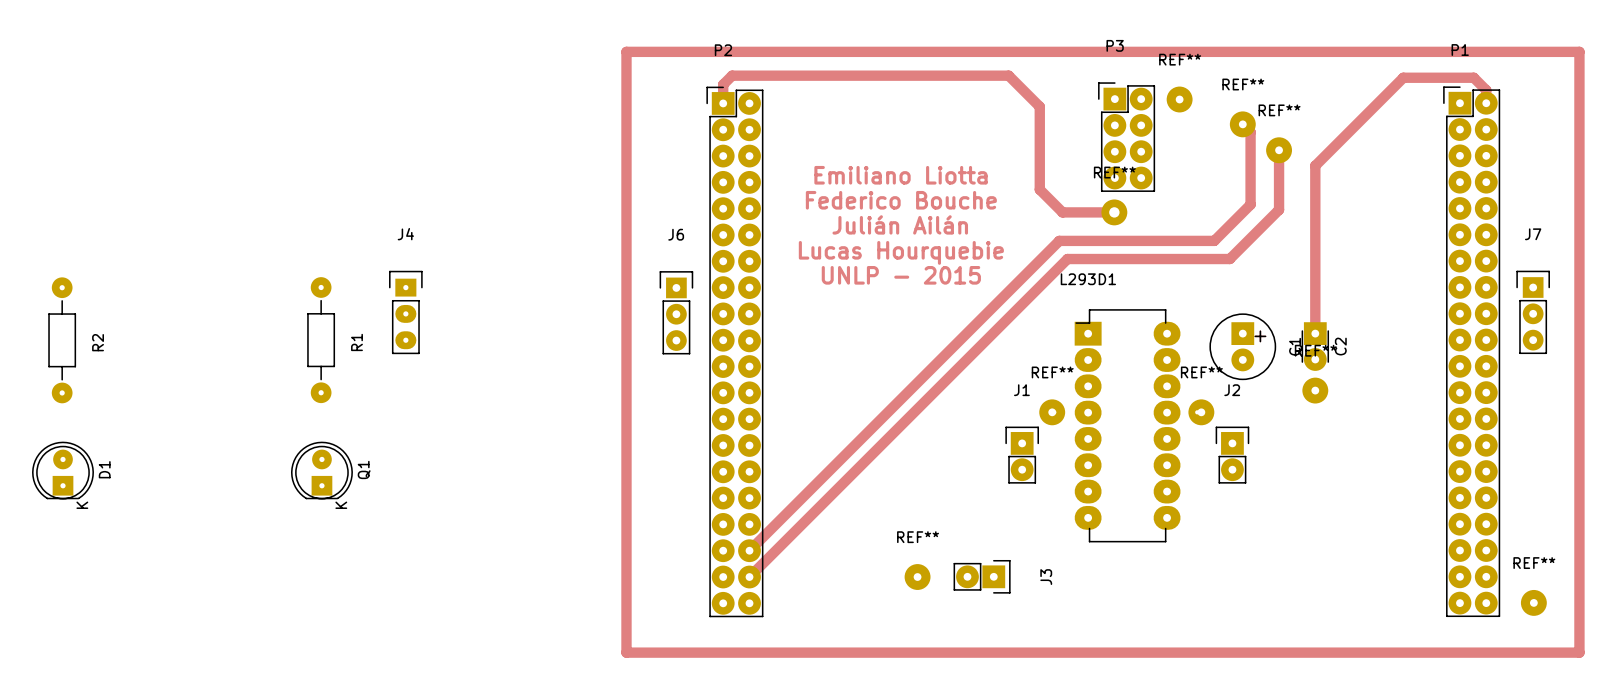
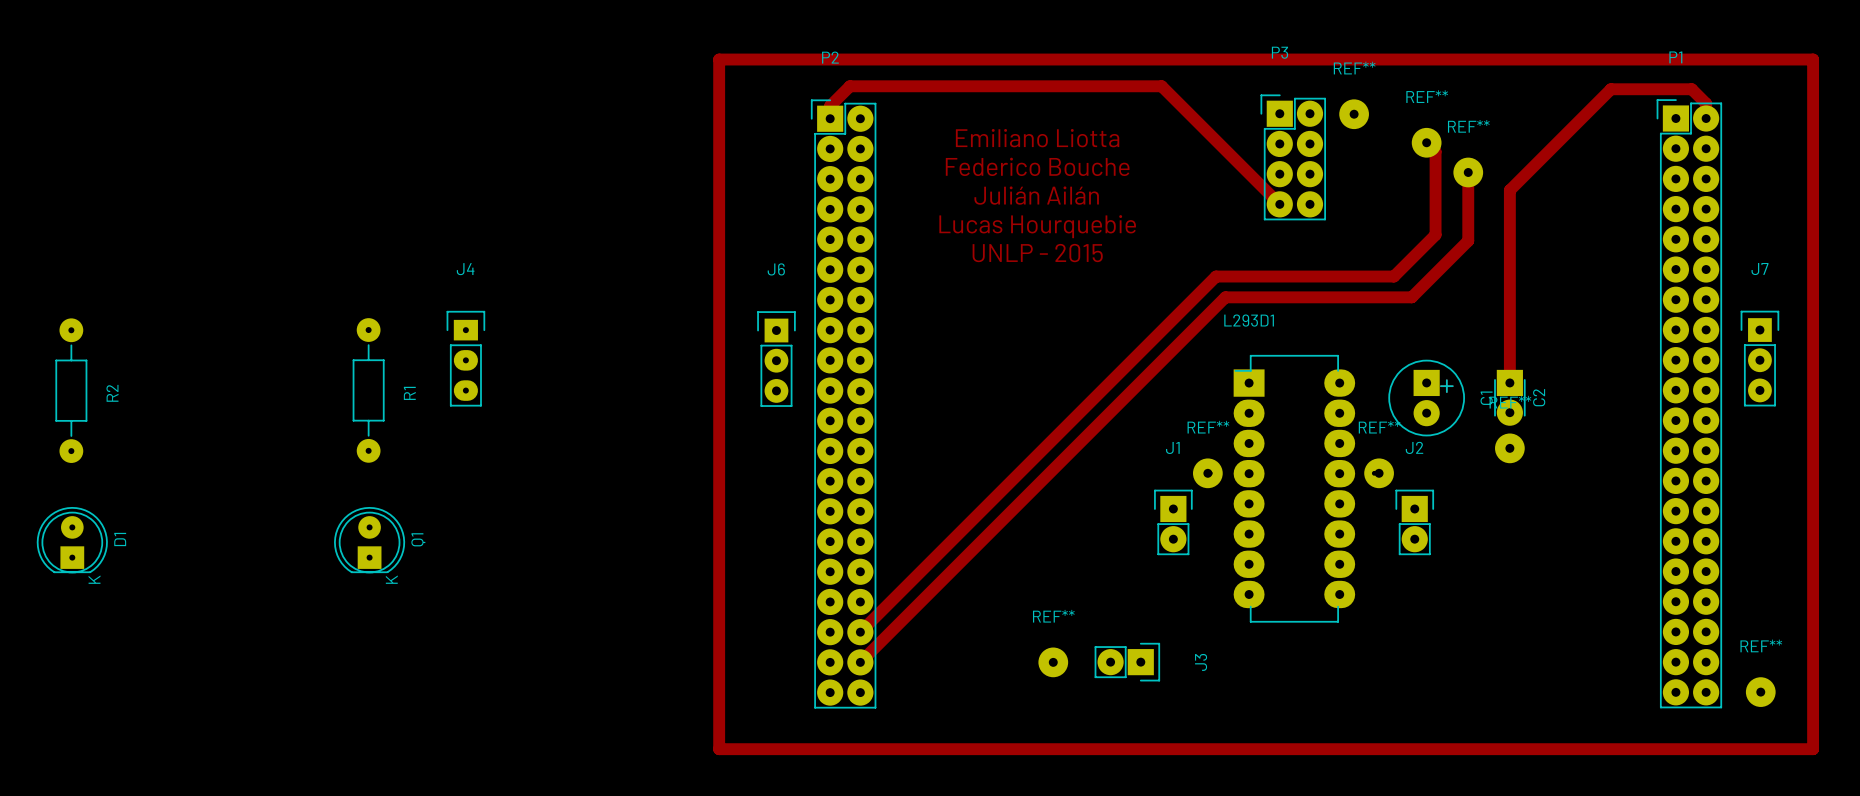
track: (723, 92) (723, 84) (732, 75) (1008, 75) (1039, 106) (1039, 189) (1062, 212) (1114, 212) -> (830, 106) (849, 86) (1161, 86) (1279, 204)
text position: Emiliano Liotta (900, 175) -> Emiliano Liotta (1037, 138)
text position: Federico Bouche (901, 200) -> Federico Bouche (1037, 166)
REF**: (1114, 212) -> none
text position: Julián Ailán (900, 224) -> Julián Ailán (1036, 195)
text position: Lucas Hourquebie (901, 252) -> Lucas Hourquebie (1037, 226)
text position: UNLP - 2015 (901, 275) -> UNLP - 2015 (1037, 253)

